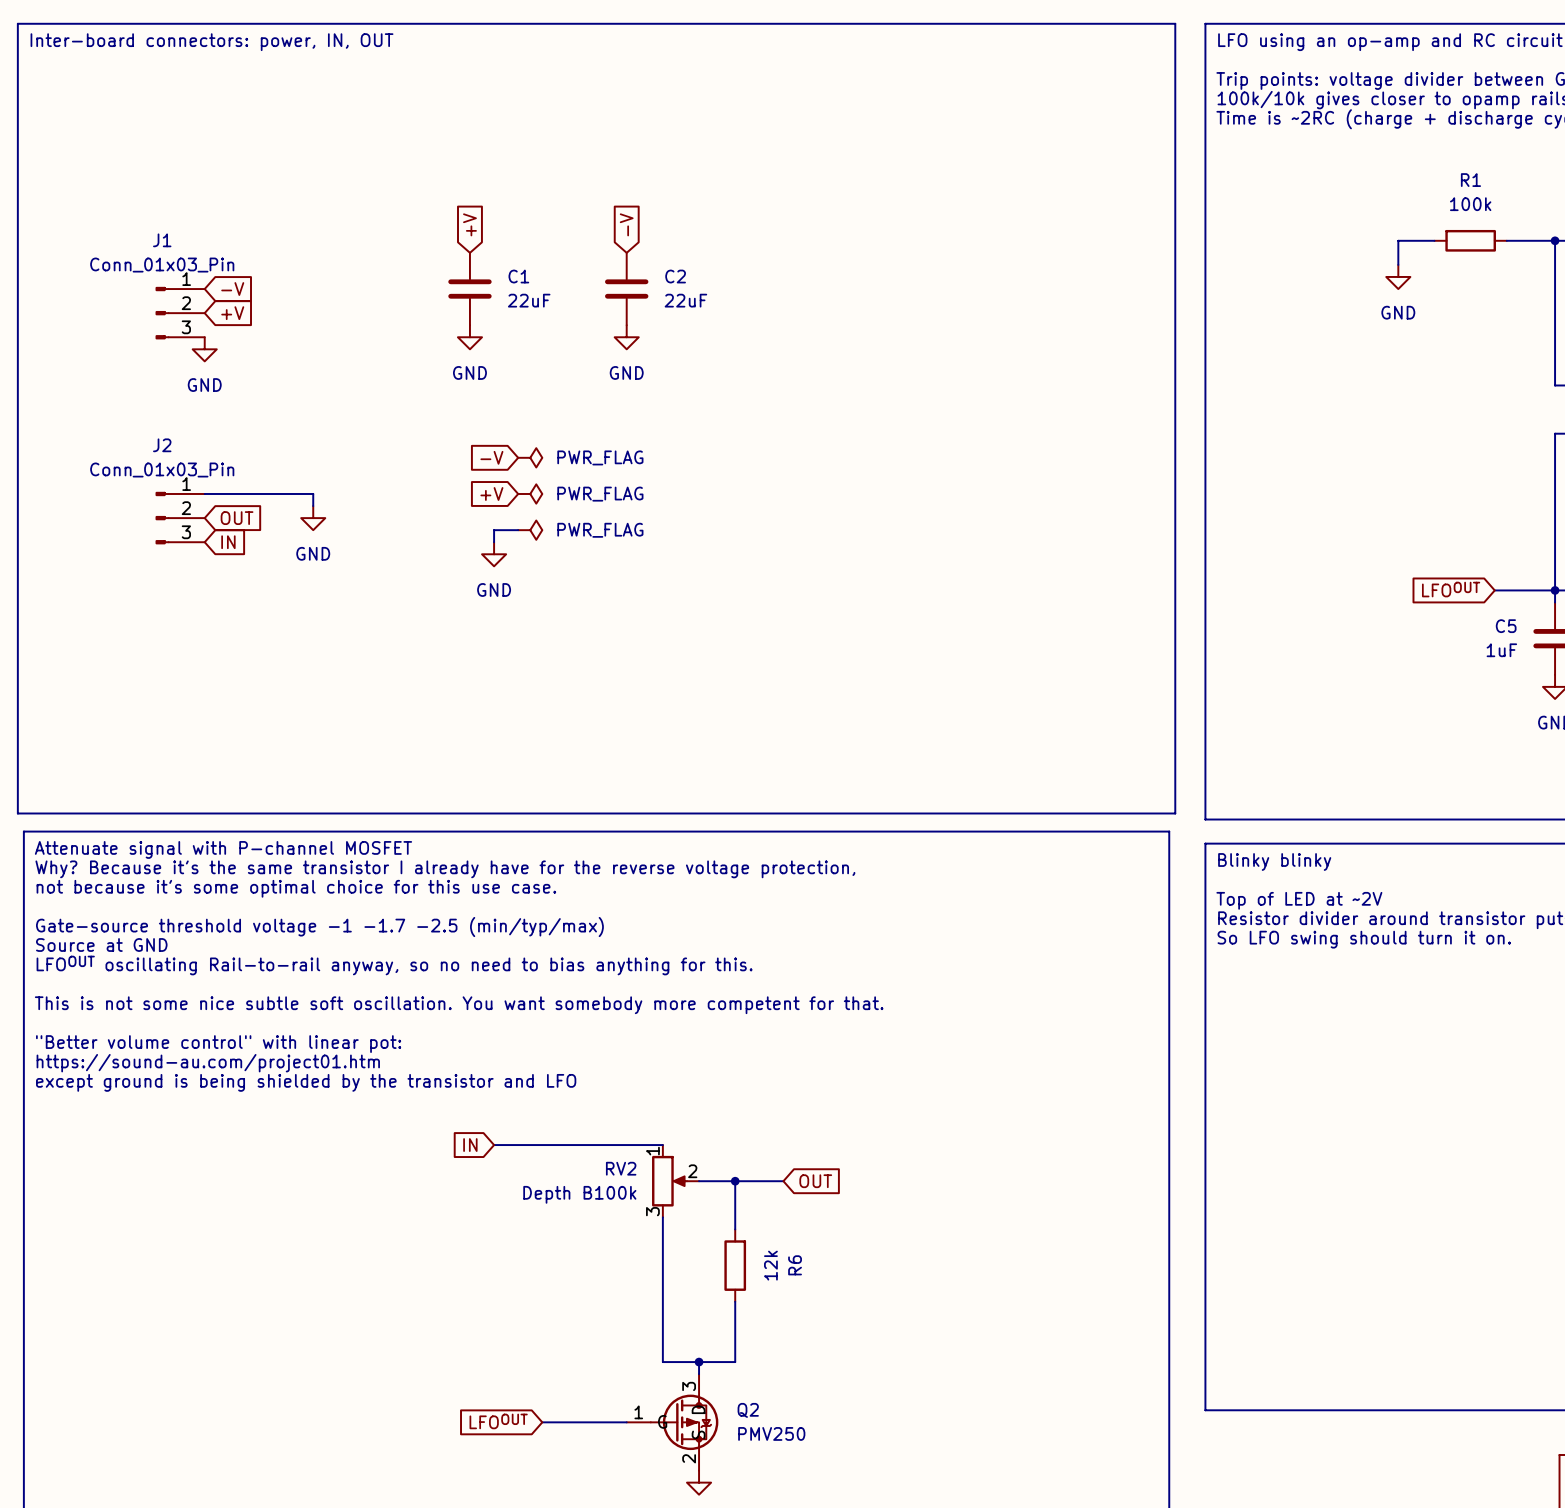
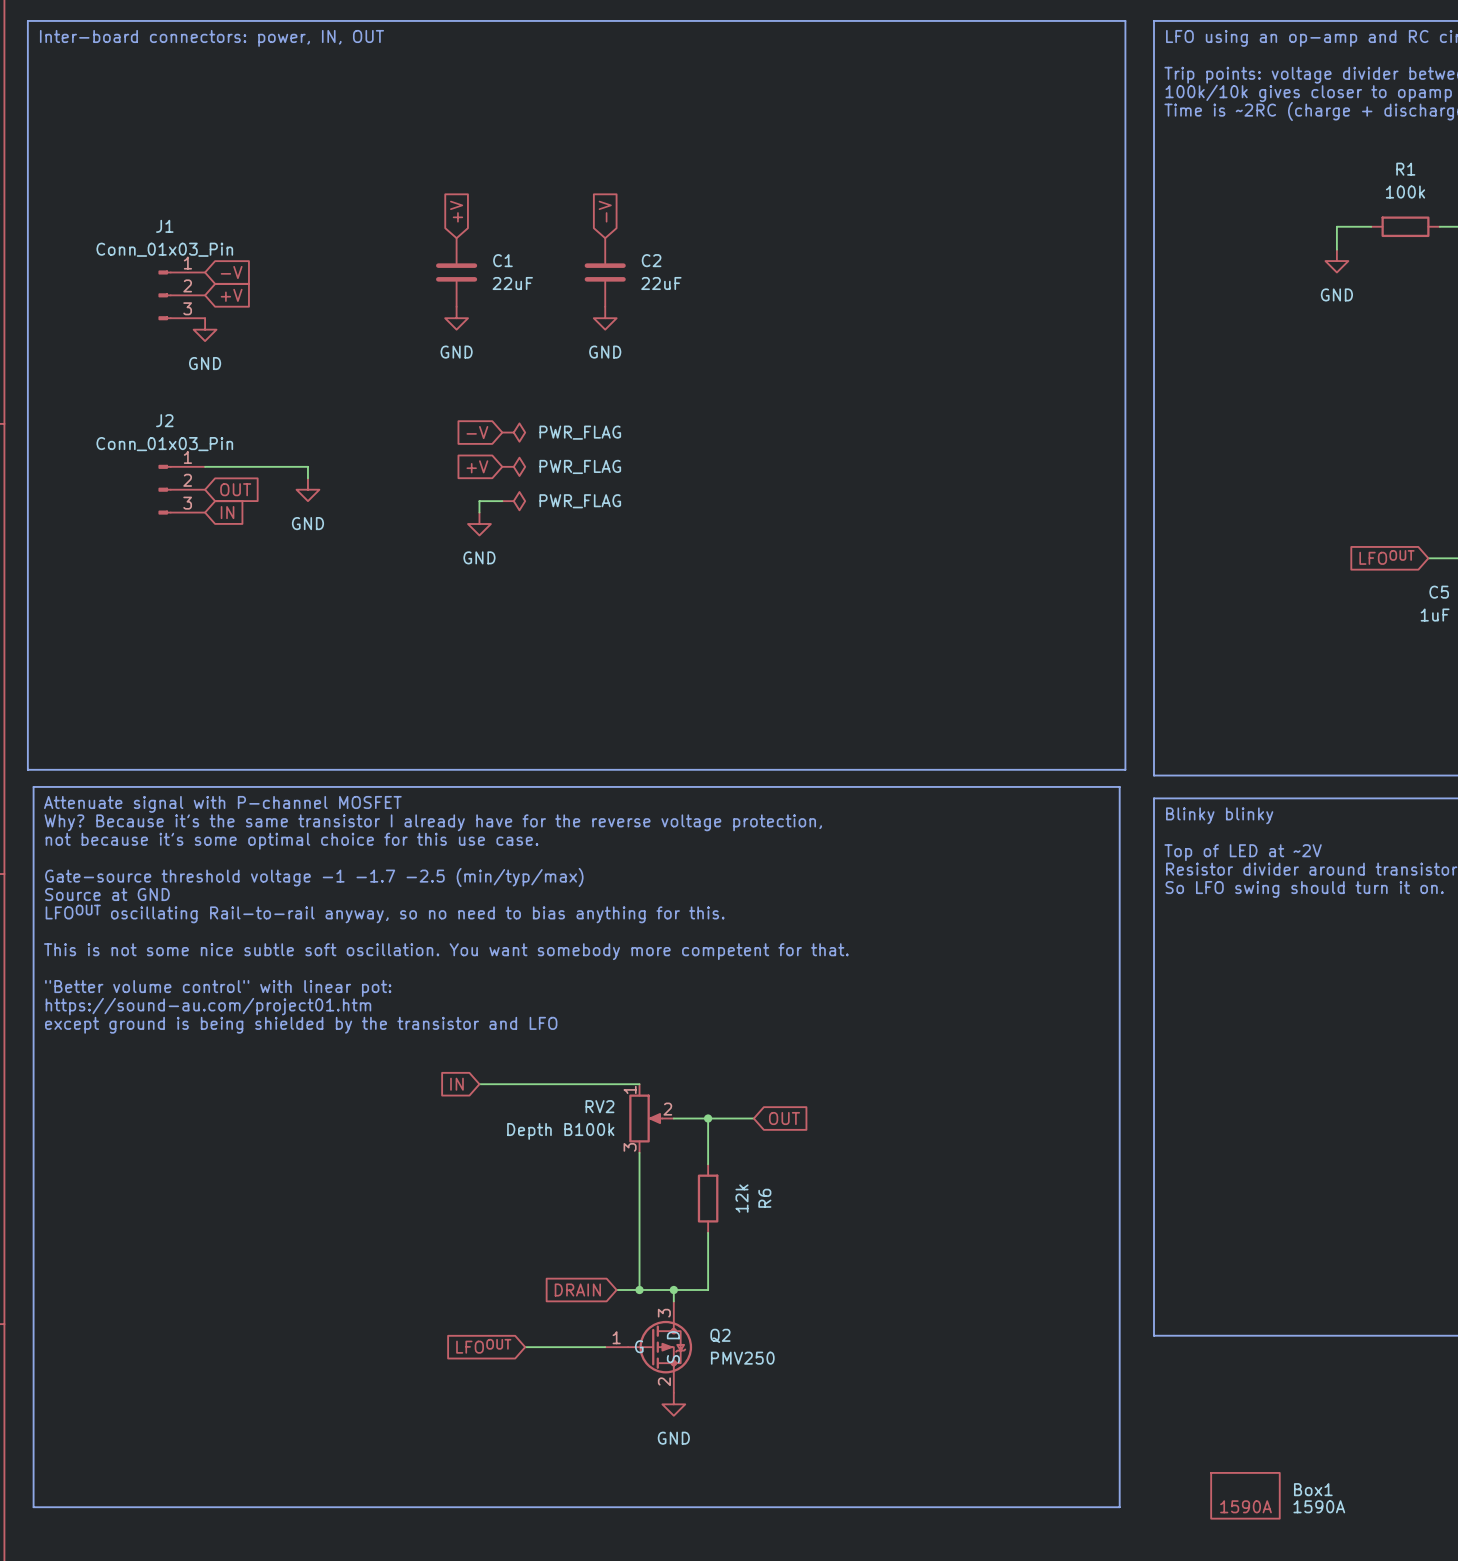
global label: none -> DRAIN (577, 1290)
wire: none -> (616, 1290) (639, 1290)
junction: none -> (639, 1290)

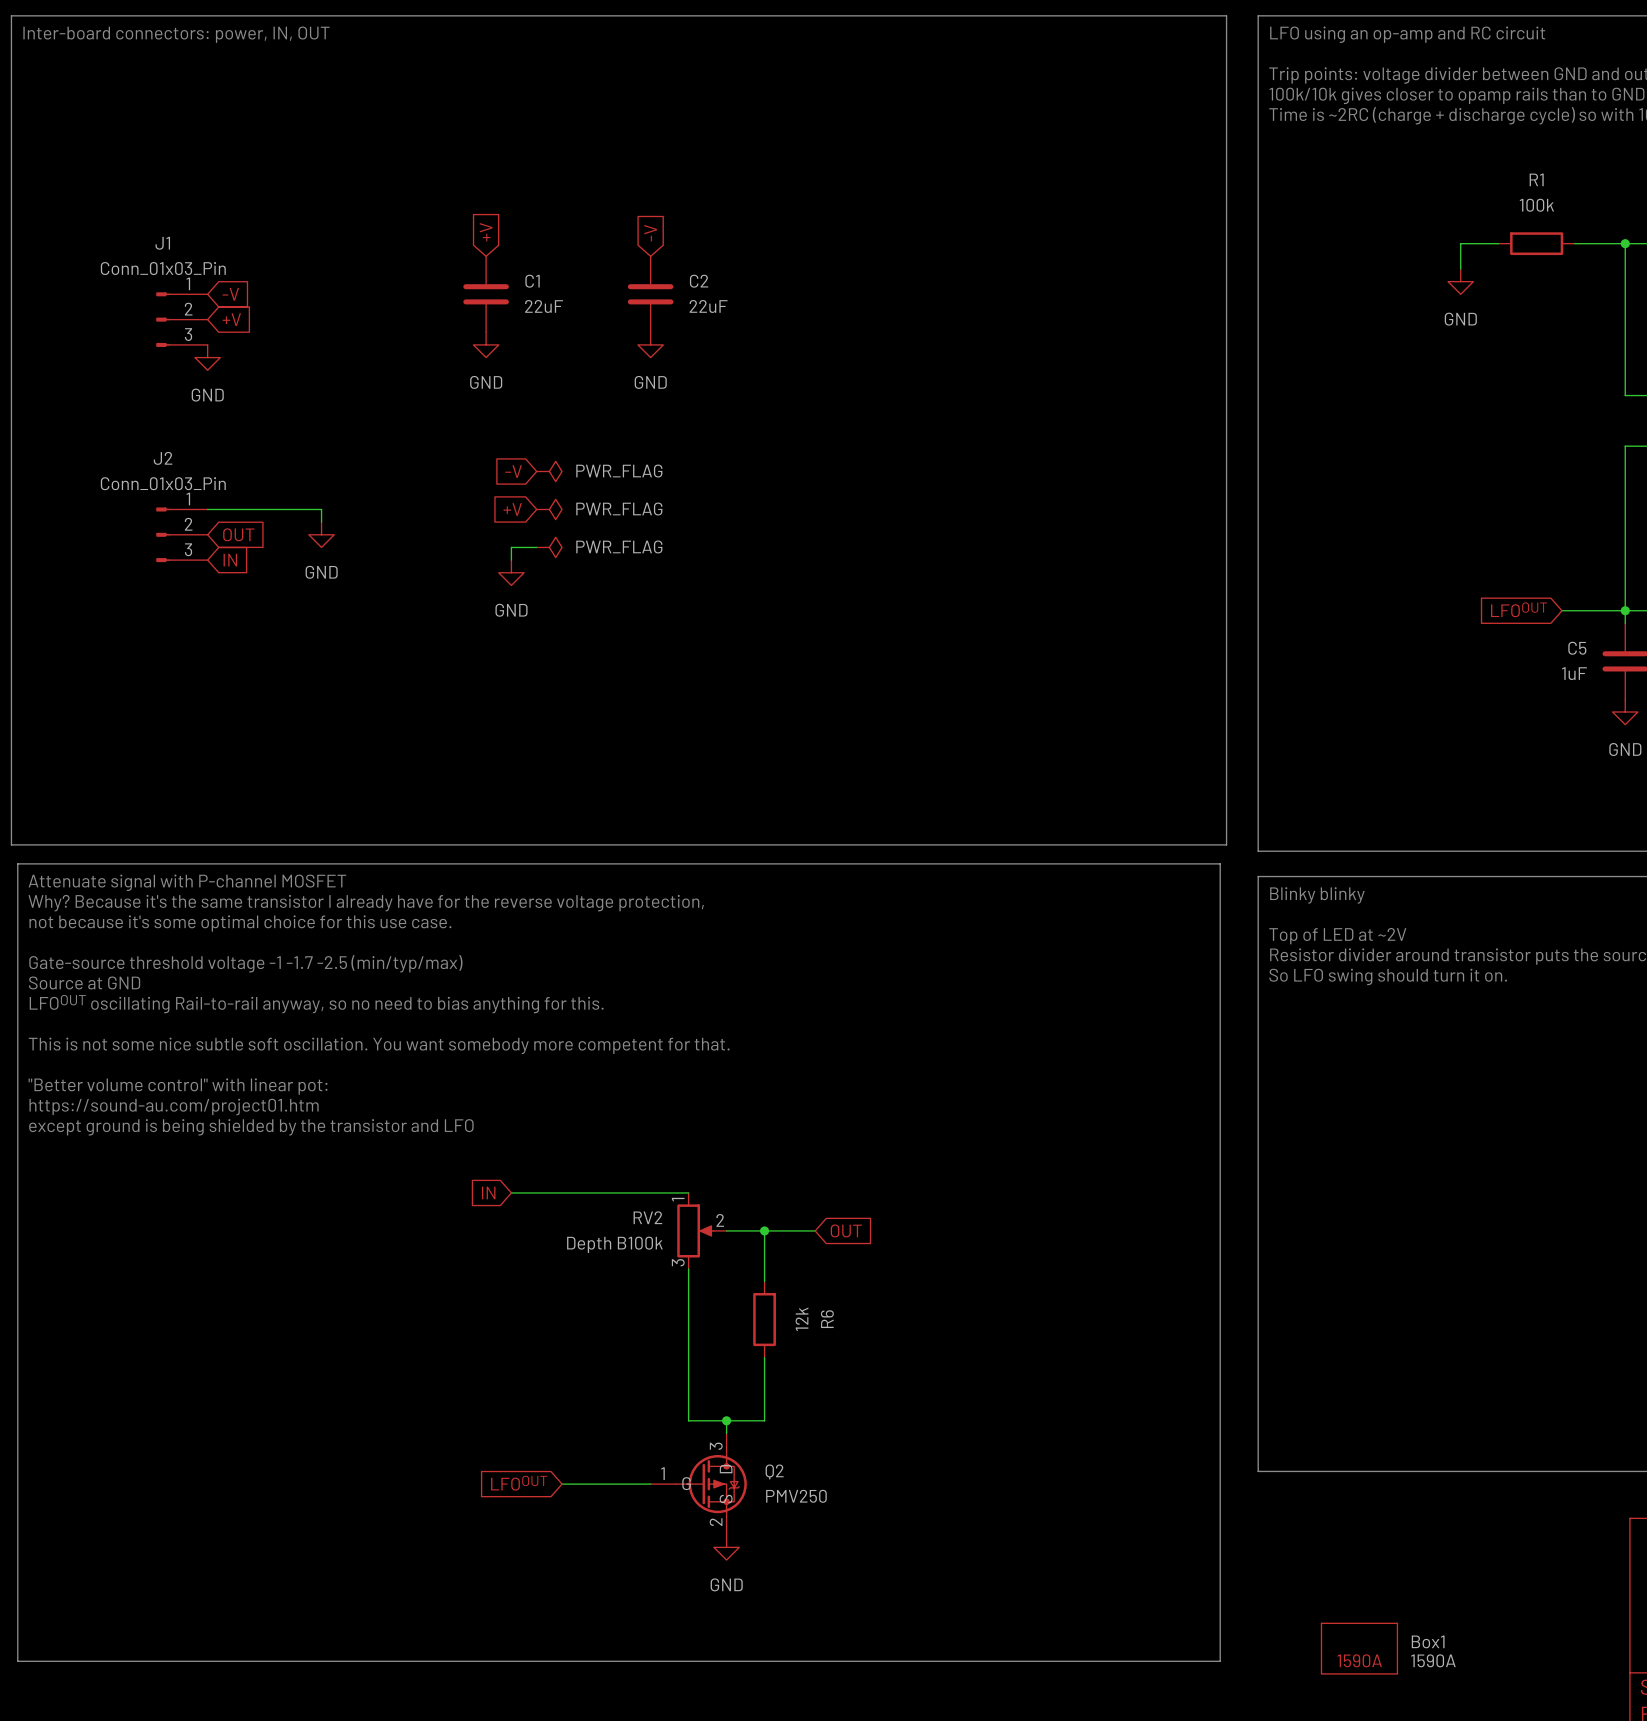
global label: DRAIN (577, 1290) -> none
wire: (616, 1290) (639, 1290) -> none
junction: (639, 1290) -> none

